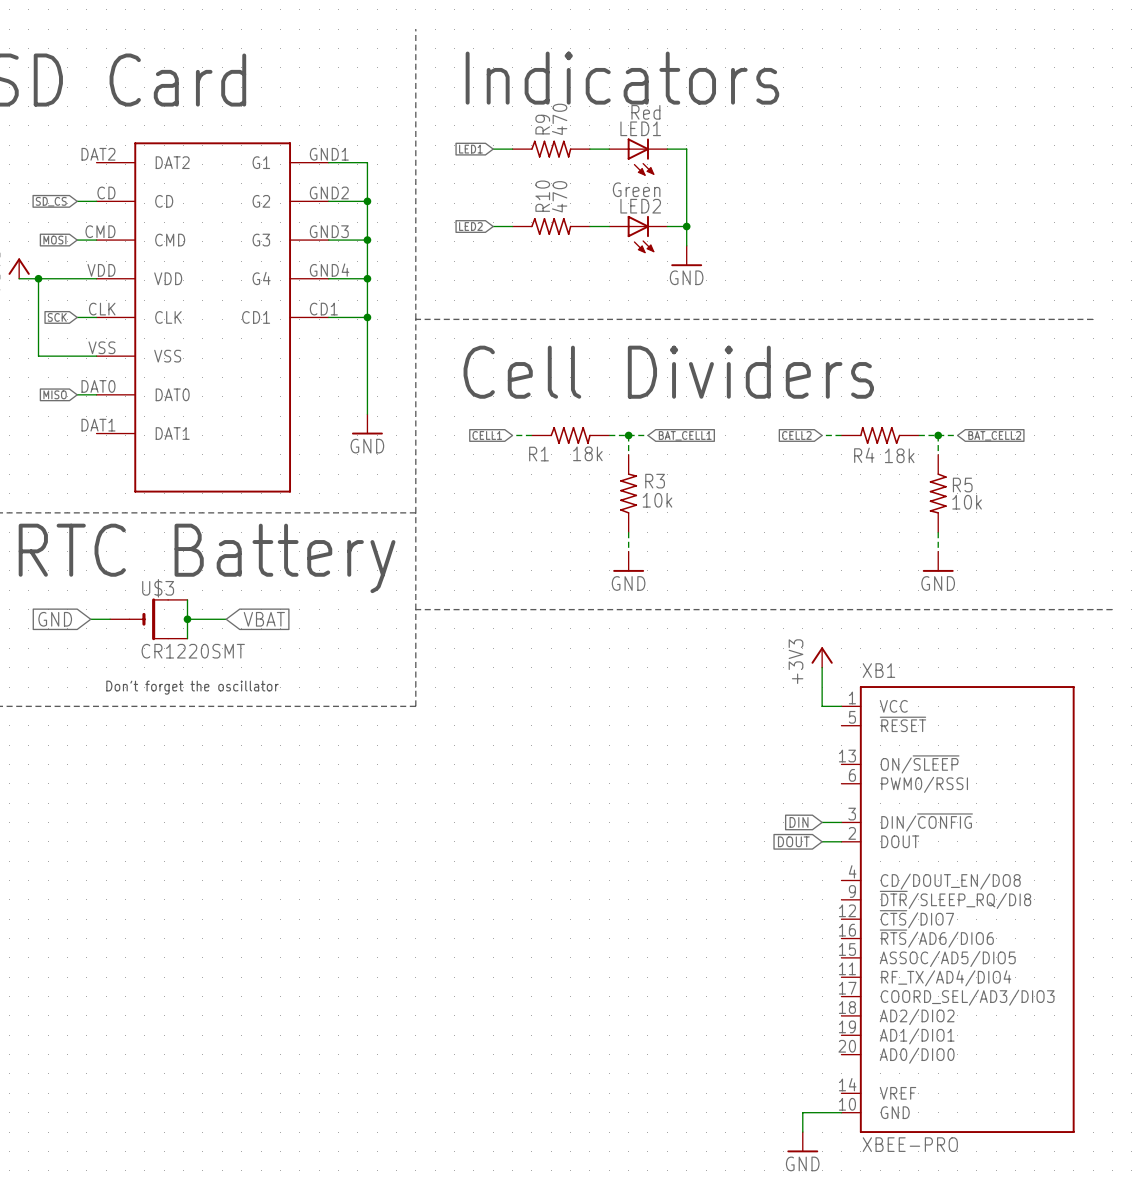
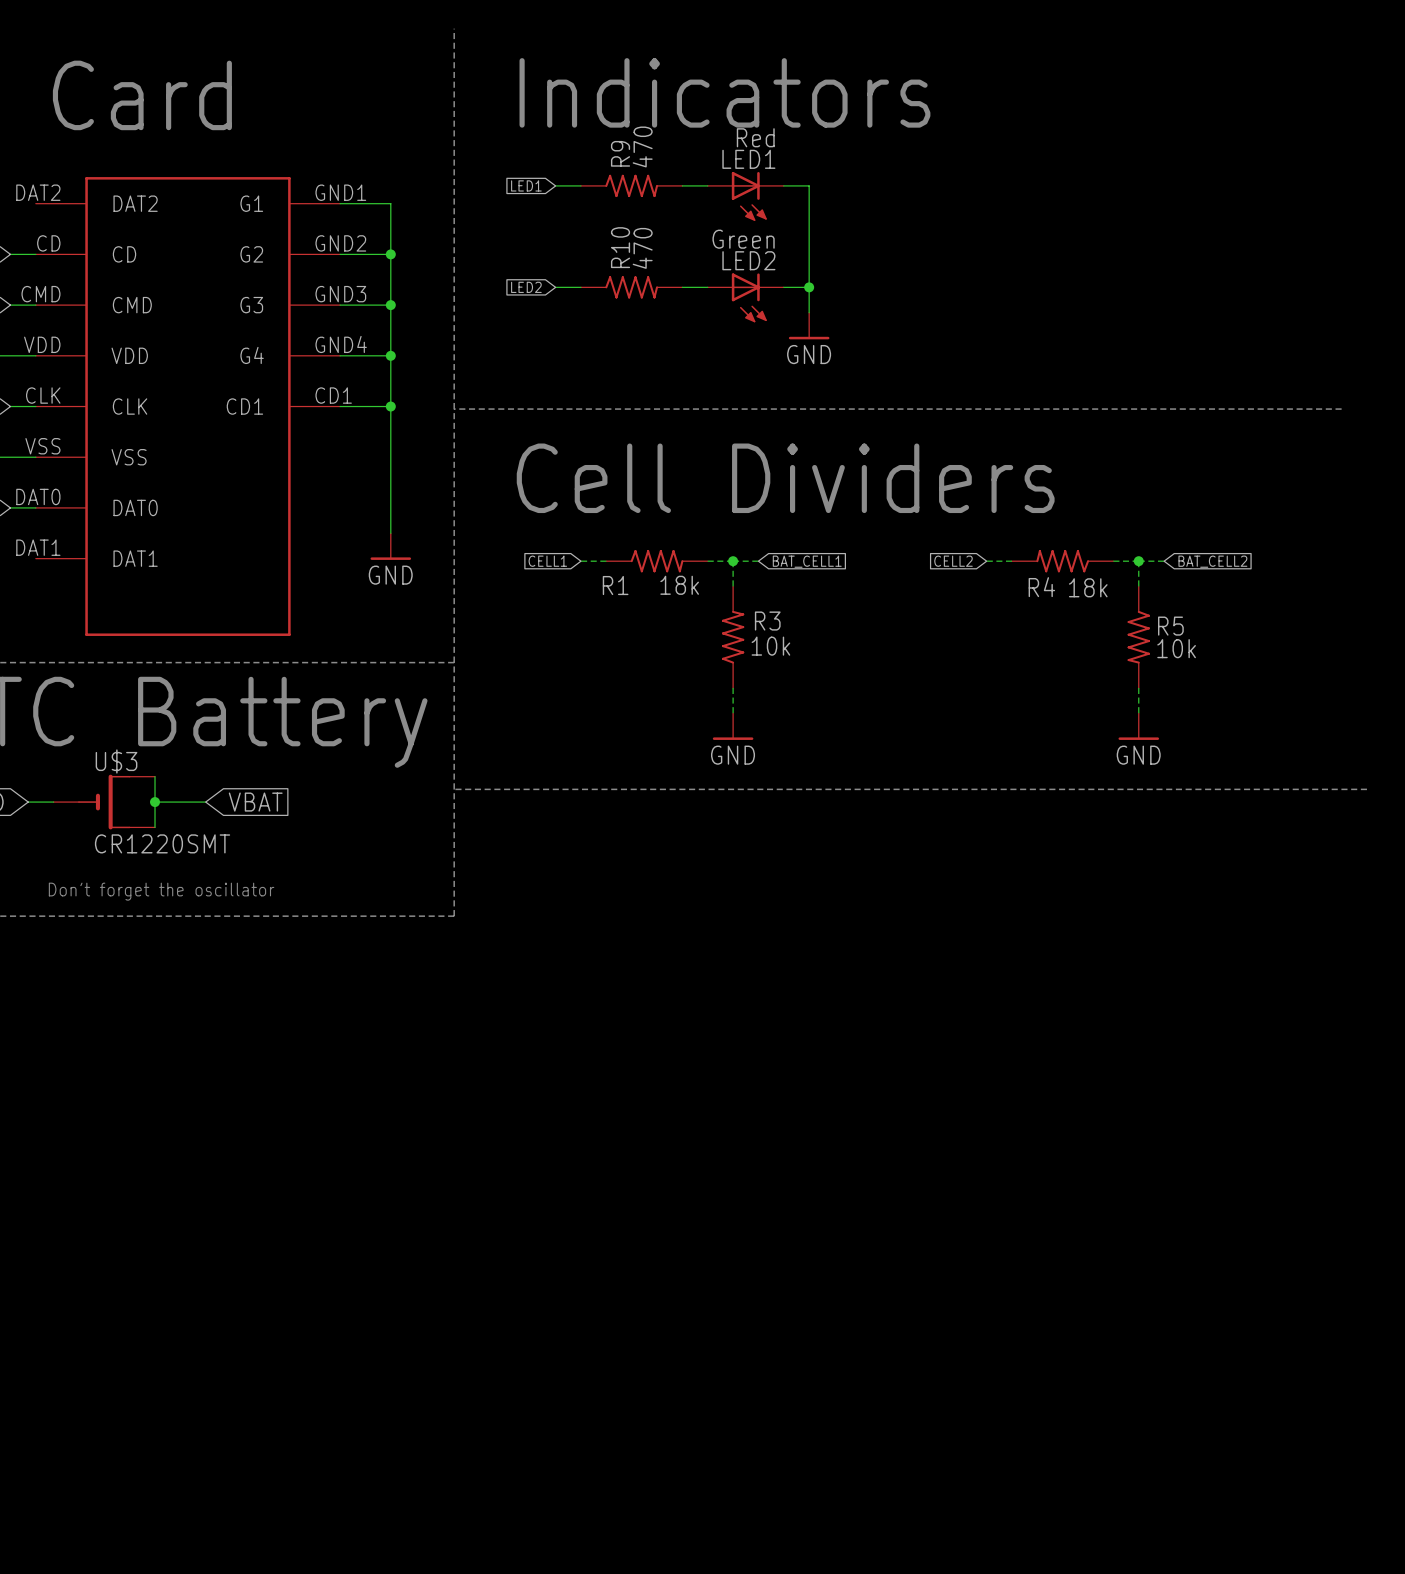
power symbol: +3V3 (822, 657) -> none
wire: (822, 667) (822, 706) (841, 706) -> none
global label: DIN (799, 822) -> none
wire: (822, 822) (841, 822) -> none
global label: DOUT (793, 841) -> none
wire: (822, 841) (841, 841) -> none
XB1: XBEE-PRO (958, 909) -> none
wire: (841, 1112) (802, 1112) (802, 1132) -> none
power symbol: GND (802, 1142) -> none

